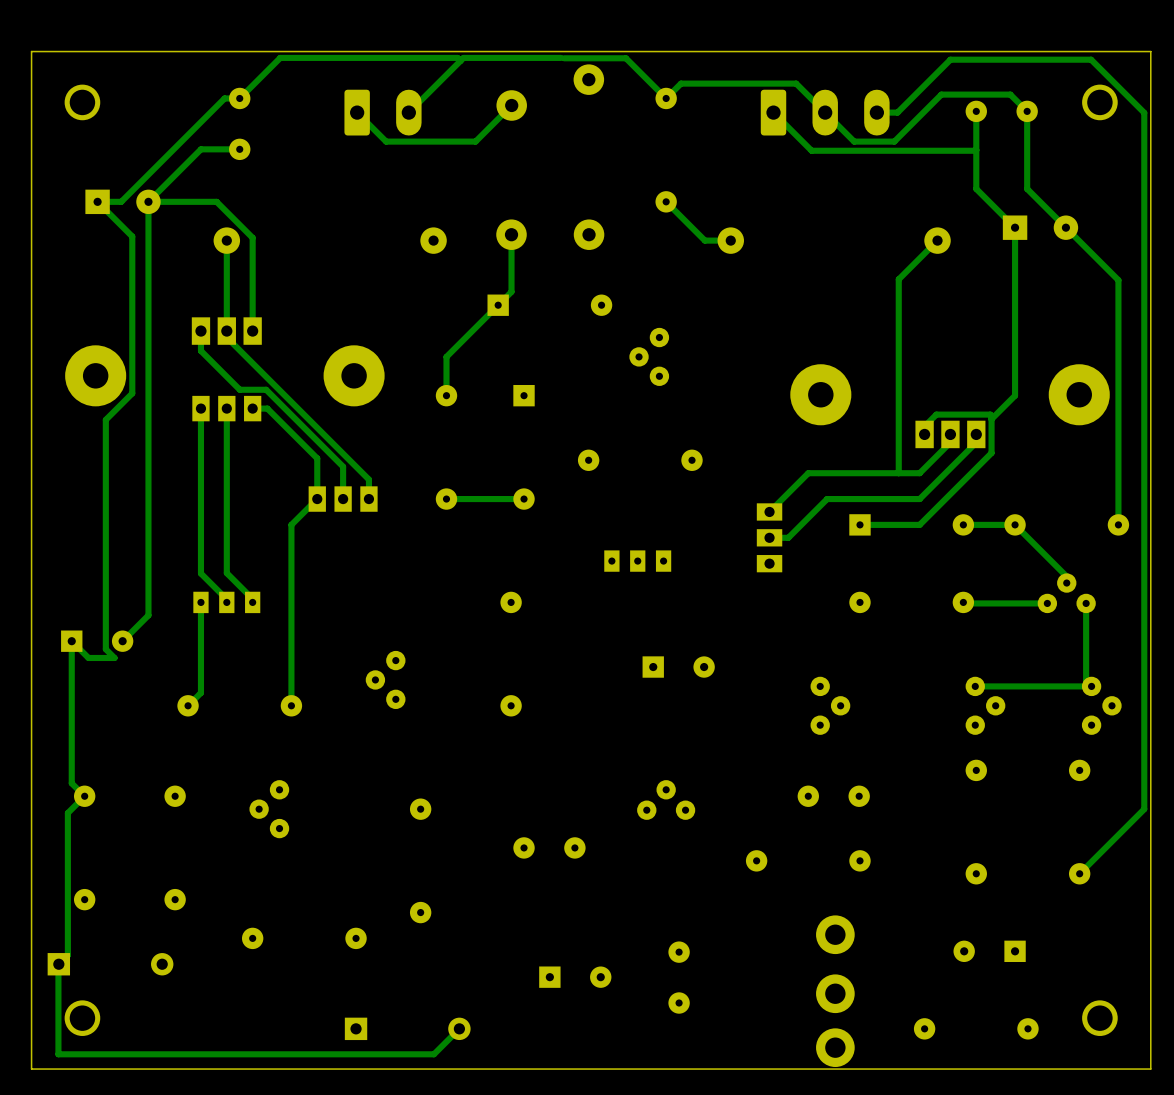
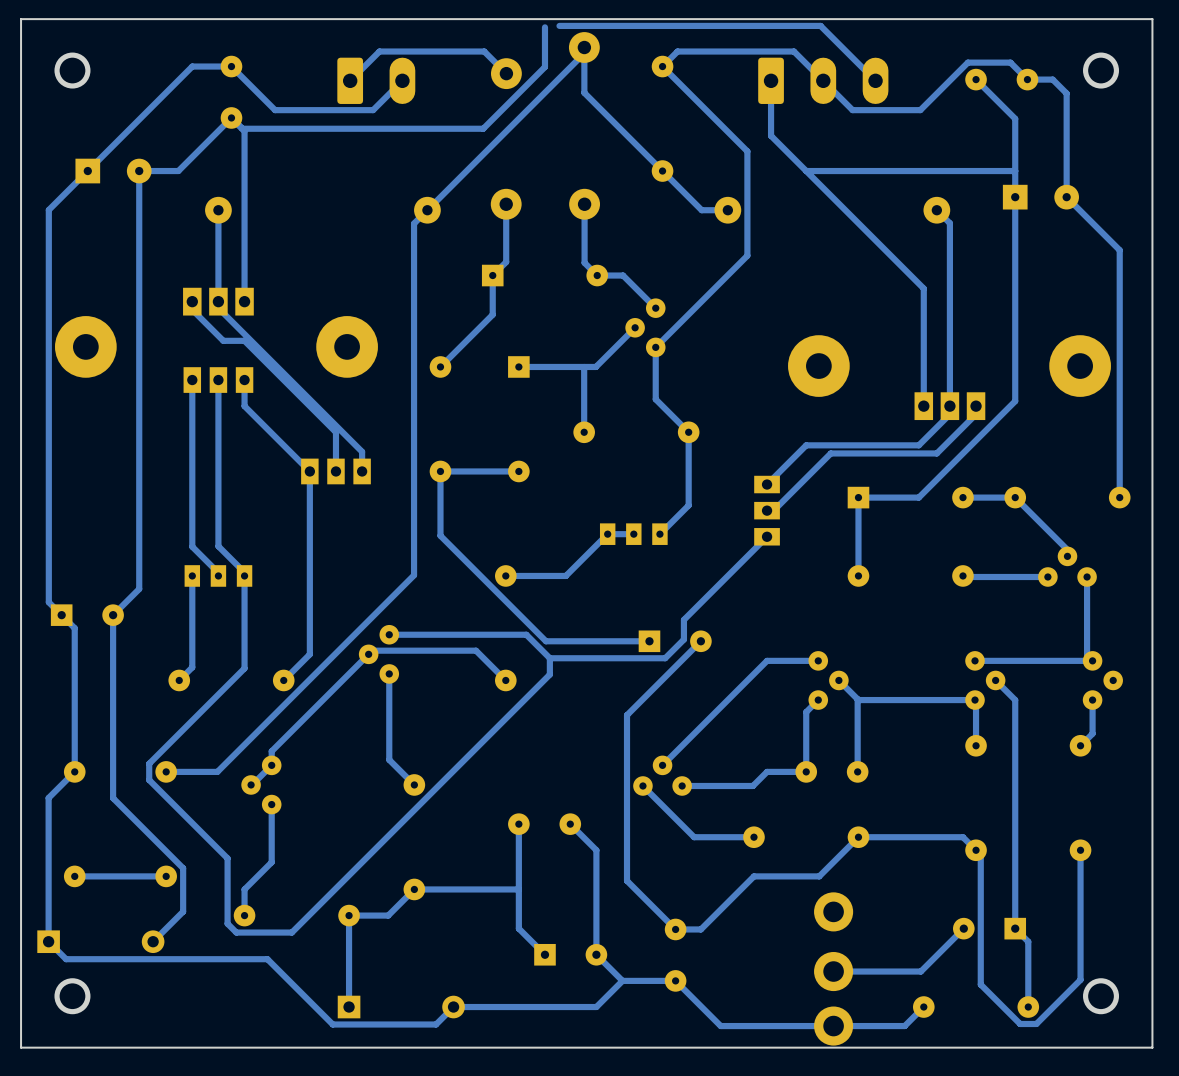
track: (561, 57) (463, 57) (408, 112) -> none
track: (625, 58) (666, 98) -> (621, 25) (820, 25) (875, 80)
track: none -> (544, 27) (544, 67) (483, 128) (242, 128)
track: (460, 60) (457, 57) (280, 57) (239, 98) -> (402, 80) (373, 110) (275, 110) (231, 66)
track: none -> (584, 47) (584, 92) (662, 171)
track: none -> (584, 53) (414, 223) (414, 575) (217, 771) (166, 771)
track: (968, 94) (941, 94) (894, 141) -> (967, 62) (920, 110) (893, 110)
track: (224, 98) (121, 201) (97, 201) (132, 236) (132, 393) (105, 419) (105, 649) (114, 657) (88, 657) (84, 654) -> (216, 66) (192, 66) (48, 210) (48, 602) (61, 615)
track: none -> (662, 66) (747, 151) (747, 255) (655, 347) (655, 399) (688, 432) (688, 505) (659, 534)
track: (511, 105) (475, 141) (386, 141) (357, 112) -> (506, 73) (484, 51) (379, 51) (350, 80)
track: (976, 111) (976, 188) (1015, 227) -> (976, 79) (1015, 118) (1015, 197)
track: (1027, 111) (1027, 188) (1065, 227) -> (1027, 79) (1052, 79) (1066, 93) (1067, 197)
track: (773, 112) (811, 150) (976, 150) -> (771, 80) (771, 135) (923, 288) (923, 398)
track: (876, 112) (897, 112) (950, 59) (1091, 59) (1144, 112) (1144, 809) (1079, 873) -> (700, 641) (627, 715) (627, 880) (675, 929) (700, 929) (753, 876) (819, 876) (858, 837) (962, 837) (980, 855) (980, 984) (1020, 1023) (1036, 1023) (1080, 979) (1080, 850)
track: (239, 149) (200, 149) (148, 201) -> none
track: (187, 201) (216, 201) (252, 237) -> (178, 171) (231, 117) (244, 131) (244, 207)
track: none -> (1015, 171) (806, 171)
track: none -> (584, 204) (584, 262) (597, 275) (623, 275) (655, 308)
track: (937, 240) (898, 279) (898, 473) -> (936, 210) (949, 223) (949, 406)
track: (498, 305) (446, 356) (446, 395) -> (492, 275) (492, 314) (440, 366)
track: (200, 339) (200, 350) (239, 389) (266, 389) (343, 466) -> (192, 309) (223, 340) (244, 340) (335, 432) (335, 438)
track: none -> (635, 327) (595, 366) (518, 366)
track: none -> (584, 366) (584, 432)
track: (1015, 395) (991, 419) -> (1015, 366) (1015, 401) (991, 424)
track: (252, 408) (267, 408) (317, 458) (317, 499) (291, 524) (291, 705) -> (244, 380) (244, 406) (309, 471) (309, 654) (283, 680)
track: (924, 426) (936, 414) (990, 414) (991, 453) -> none
track: (937, 481) (919, 499) (827, 499) (788, 537) (776, 537) -> (936, 453) (830, 453) (773, 510)
track: none -> (440, 471) (440, 535) (545, 641) (649, 641)
track: none -> (858, 497) (858, 575)
track: none -> (633, 534) (607, 534) (565, 575) (505, 575)
track: none -> (767, 536) (683, 619) (683, 639) (665, 658) (549, 658)
track: none -> (244, 575) (244, 668) (149, 763) (149, 780) (227, 858) (227, 923) (236, 932) (291, 932) (549, 674) (549, 658)
track: (71, 641) (71, 783) (84, 796) -> (74, 628) (74, 771)
track: none -> (113, 615) (113, 798) (183, 868) (183, 911) (153, 941)
track: none -> (389, 634) (526, 634) (549, 658)
track: none -> (818, 660) (767, 660) (662, 765)
track: none -> (389, 673) (389, 759) (414, 784)
track: none -> (505, 680) (476, 650) (372, 650) (271, 751) (271, 765) (251, 784)
track: none -> (838, 680) (858, 700) (975, 700) (976, 745)
track: none -> (995, 680) (1015, 700) (1015, 928) (1028, 941) (1028, 1007)
track: none -> (857, 699) (857, 771)
track: none -> (818, 700) (806, 712) (806, 771) (767, 771) (752, 785) (682, 785)
track: none -> (1092, 700) (1092, 733) (1080, 745)
track: none -> (642, 785) (694, 837) (753, 837)
track: (67, 813) (67, 955) (58, 964) (58, 1054) (433, 1054) (442, 1046) -> (57, 788) (48, 798) (48, 941) (66, 959) (267, 959) (332, 1024) (436, 1024)
track: none -> (271, 804) (271, 862) (244, 889) (244, 915)
track: none -> (518, 824) (518, 928) (544, 954)
track: none -> (570, 824) (596, 850) (596, 954) (622, 980)
track: none -> (166, 876) (74, 876)
track: none -> (518, 889) (414, 889) (388, 915) (349, 915) (349, 1007)
track: none -> (963, 928) (920, 971) (833, 971)
track: none -> (622, 980) (675, 980) (720, 1026) (904, 1026) (923, 1007)
track: none -> (622, 980) (596, 1007) (453, 1007)

